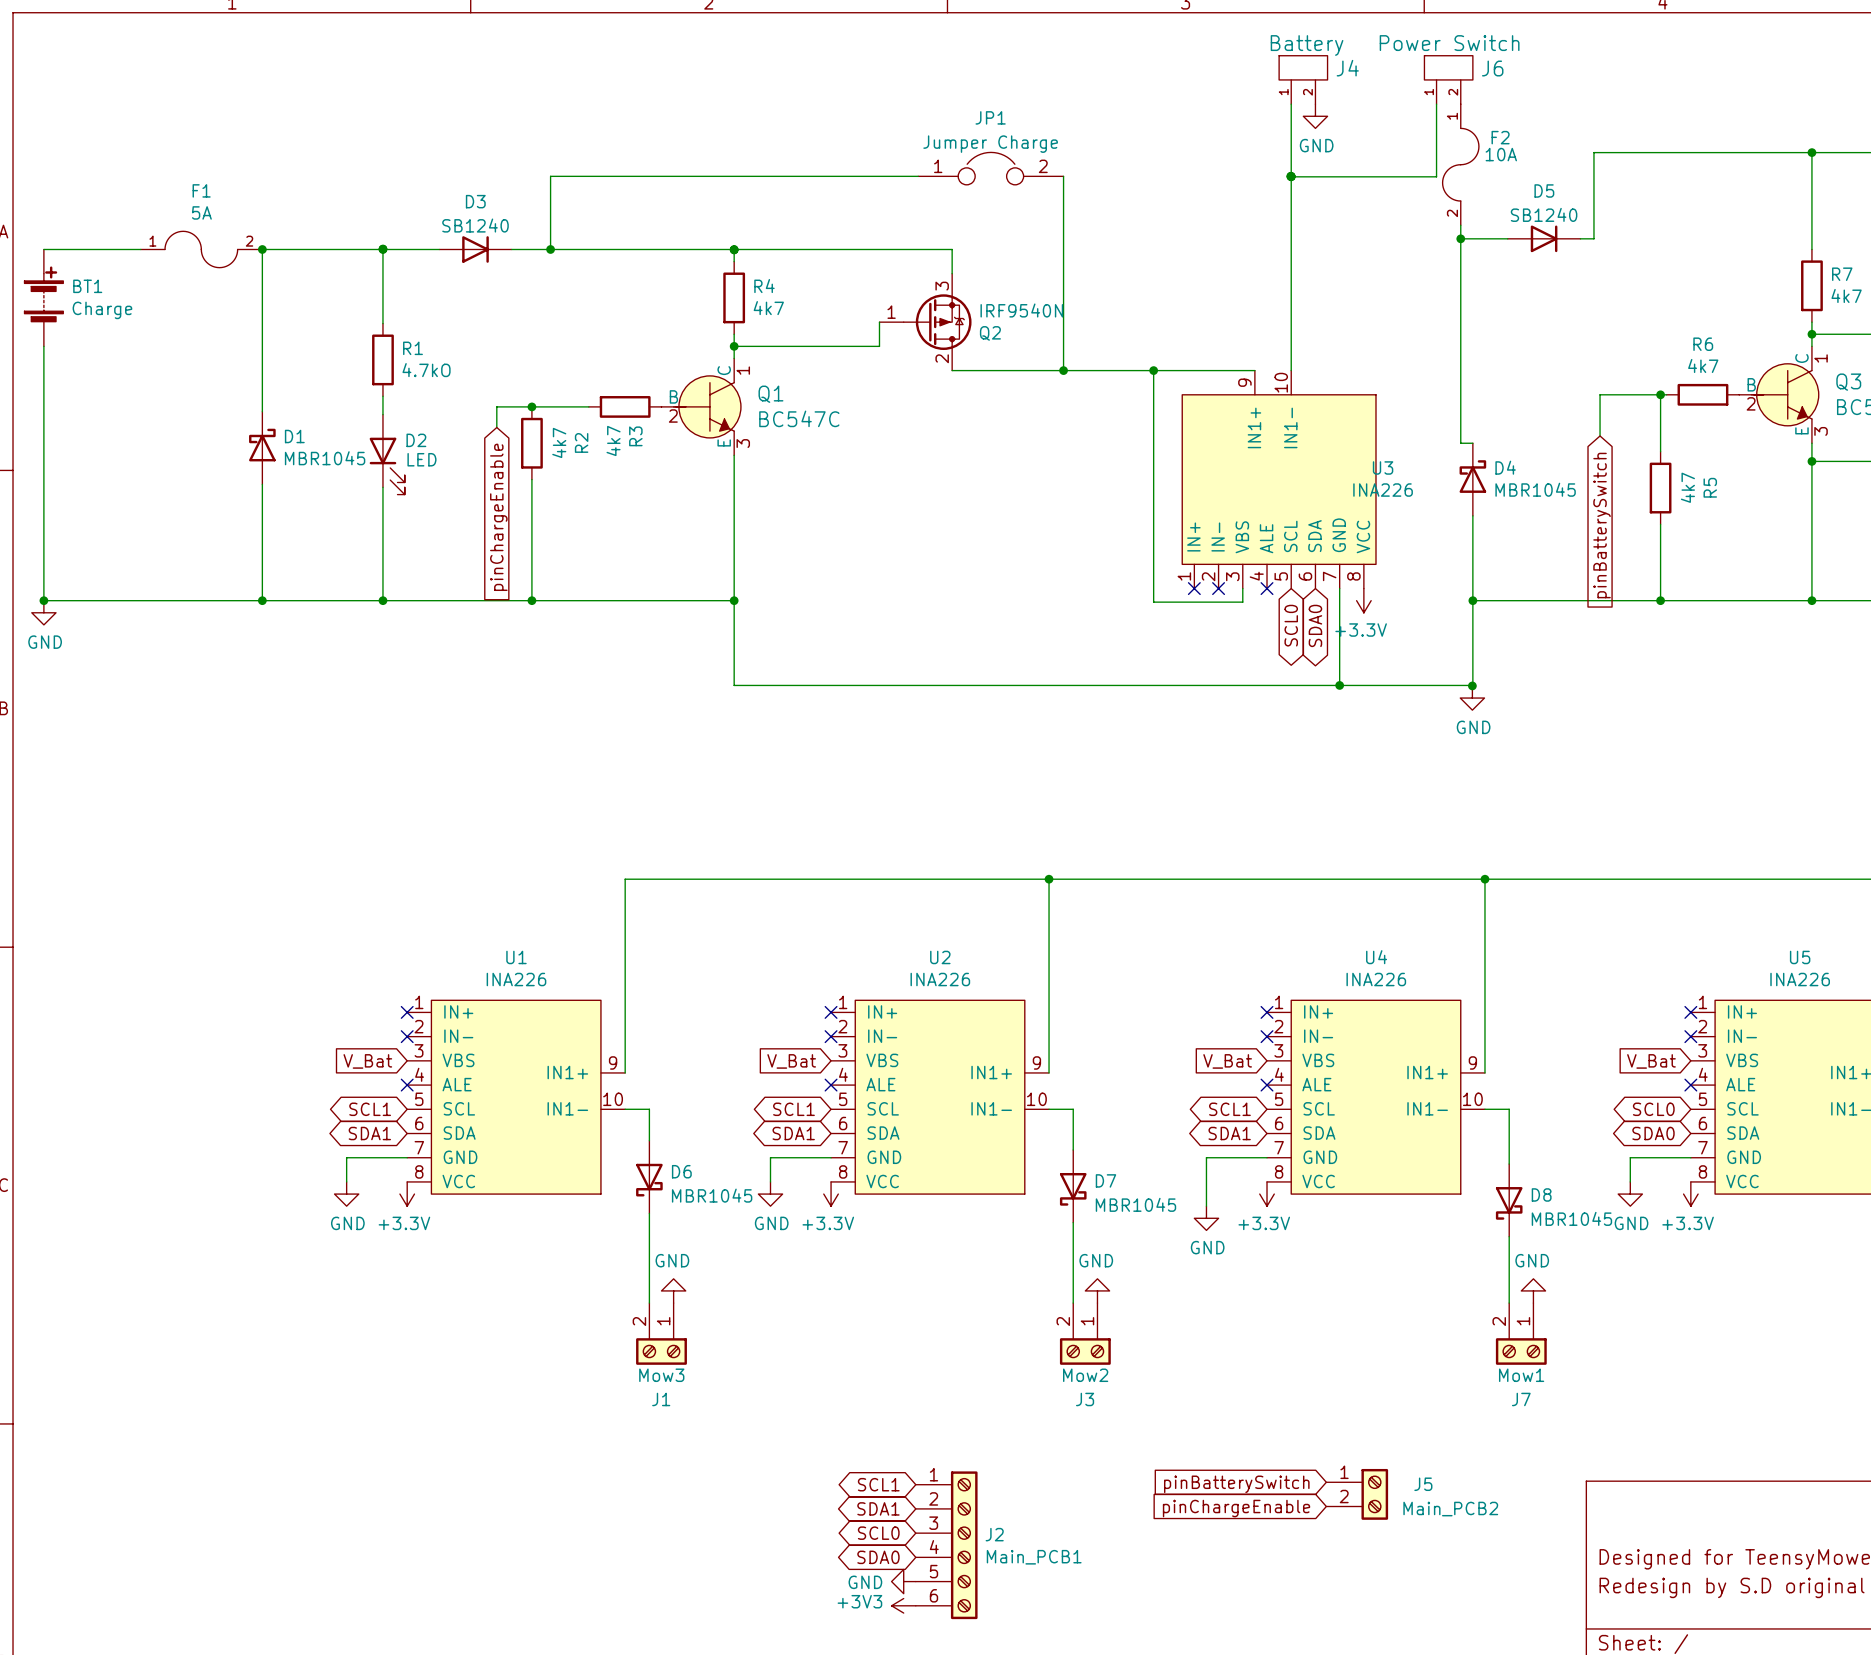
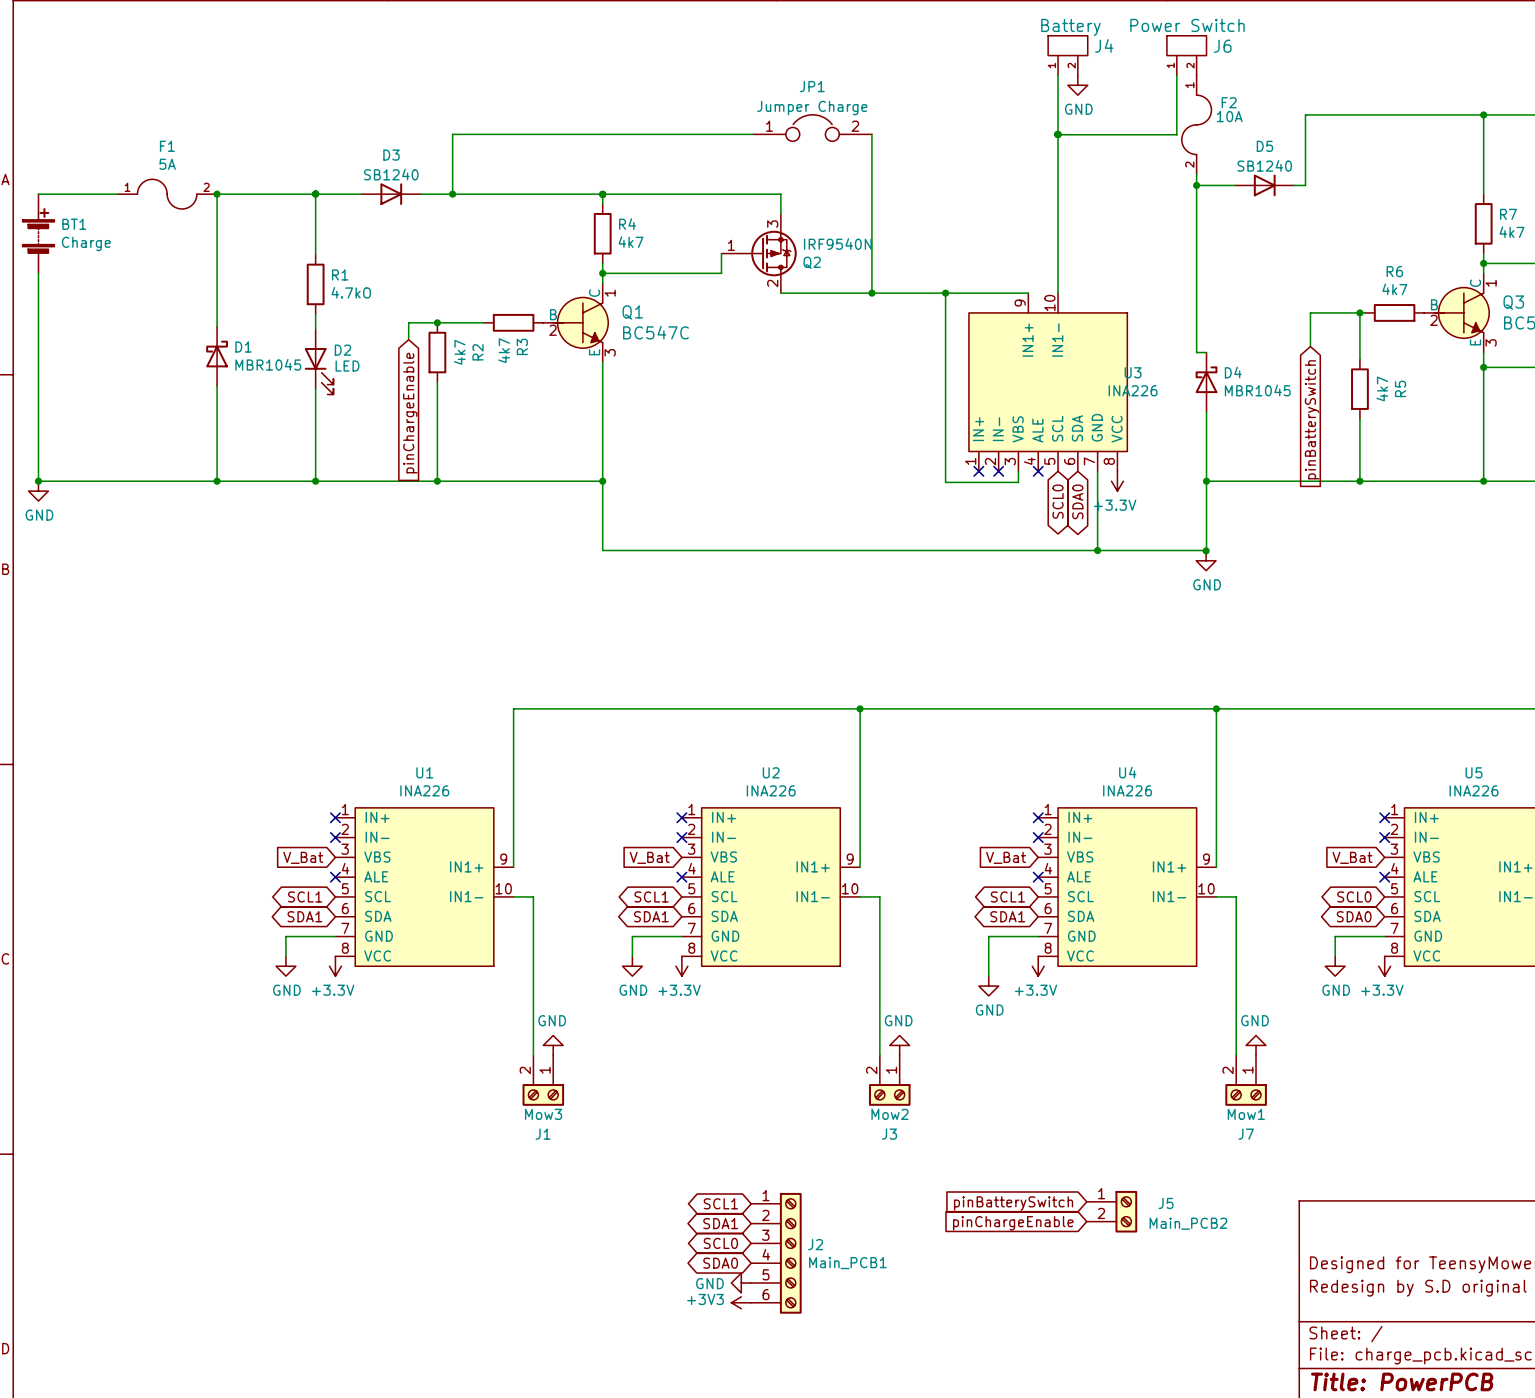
D6: MBR1045 (649, 1177) -> none
D7: MBR1045 (1073, 1186) -> none
D8: MBR1045 (1509, 1200) -> none

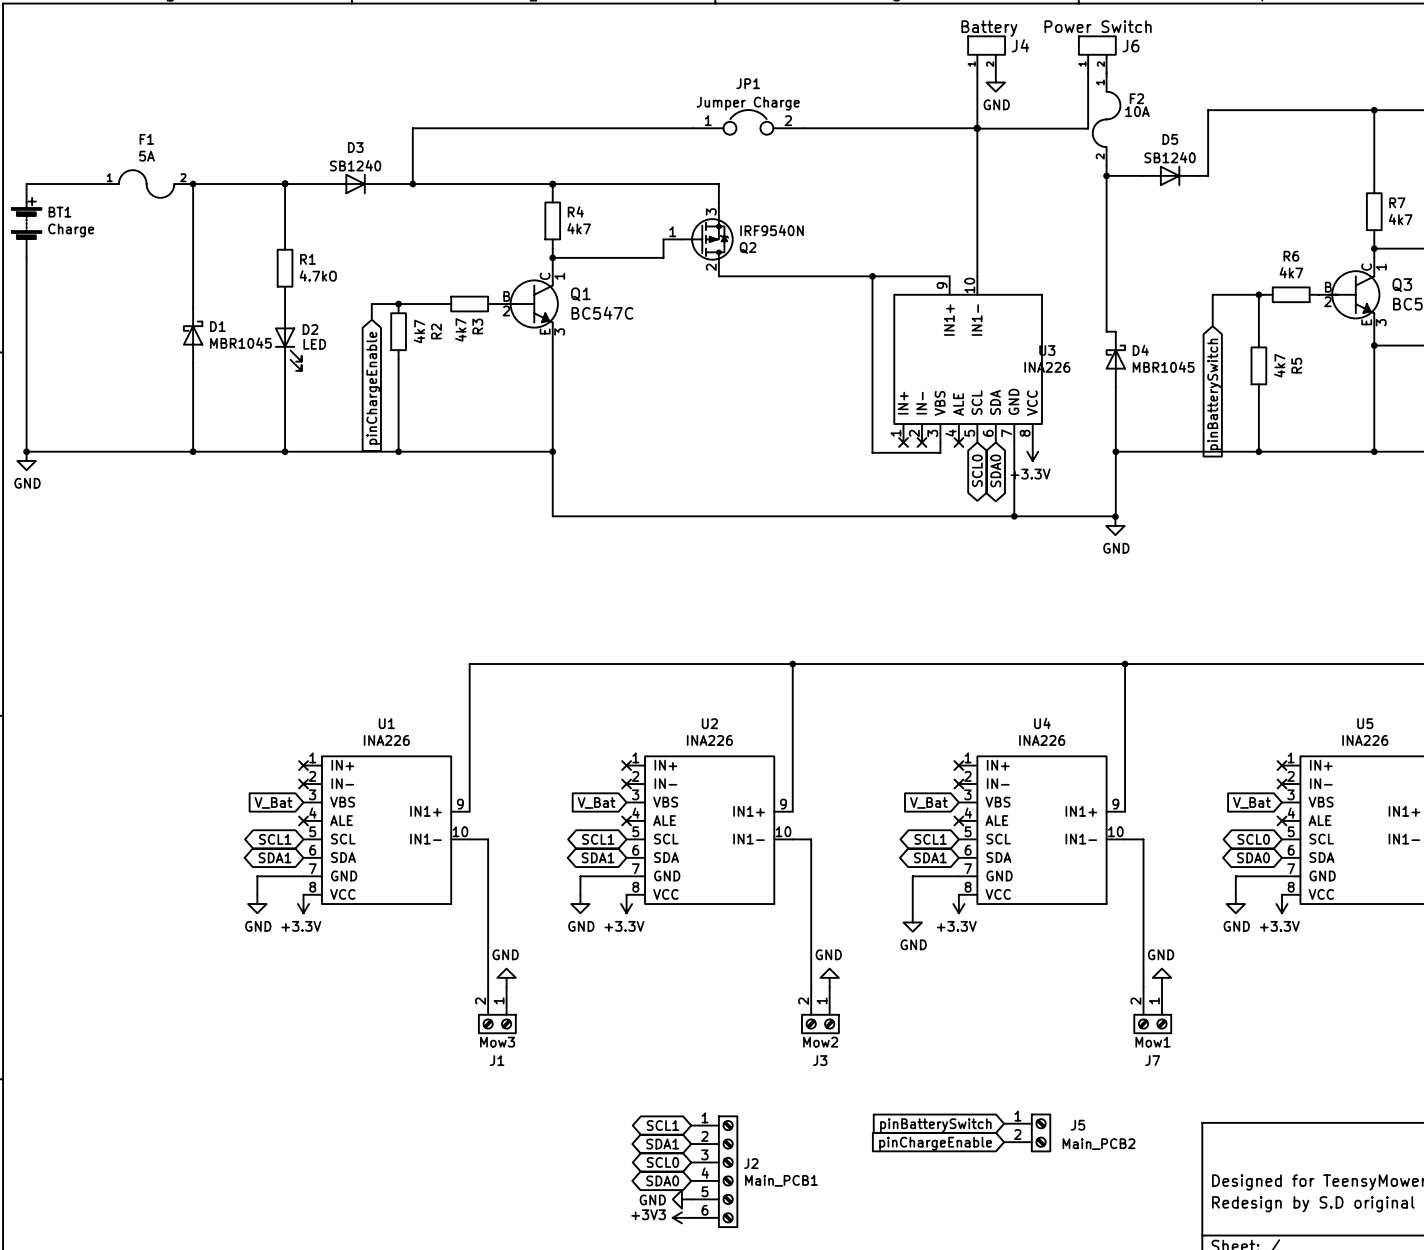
wire: (871, 134) (871, 293) -> (803, 128) (976, 128)
junction: (871, 293) -> none

